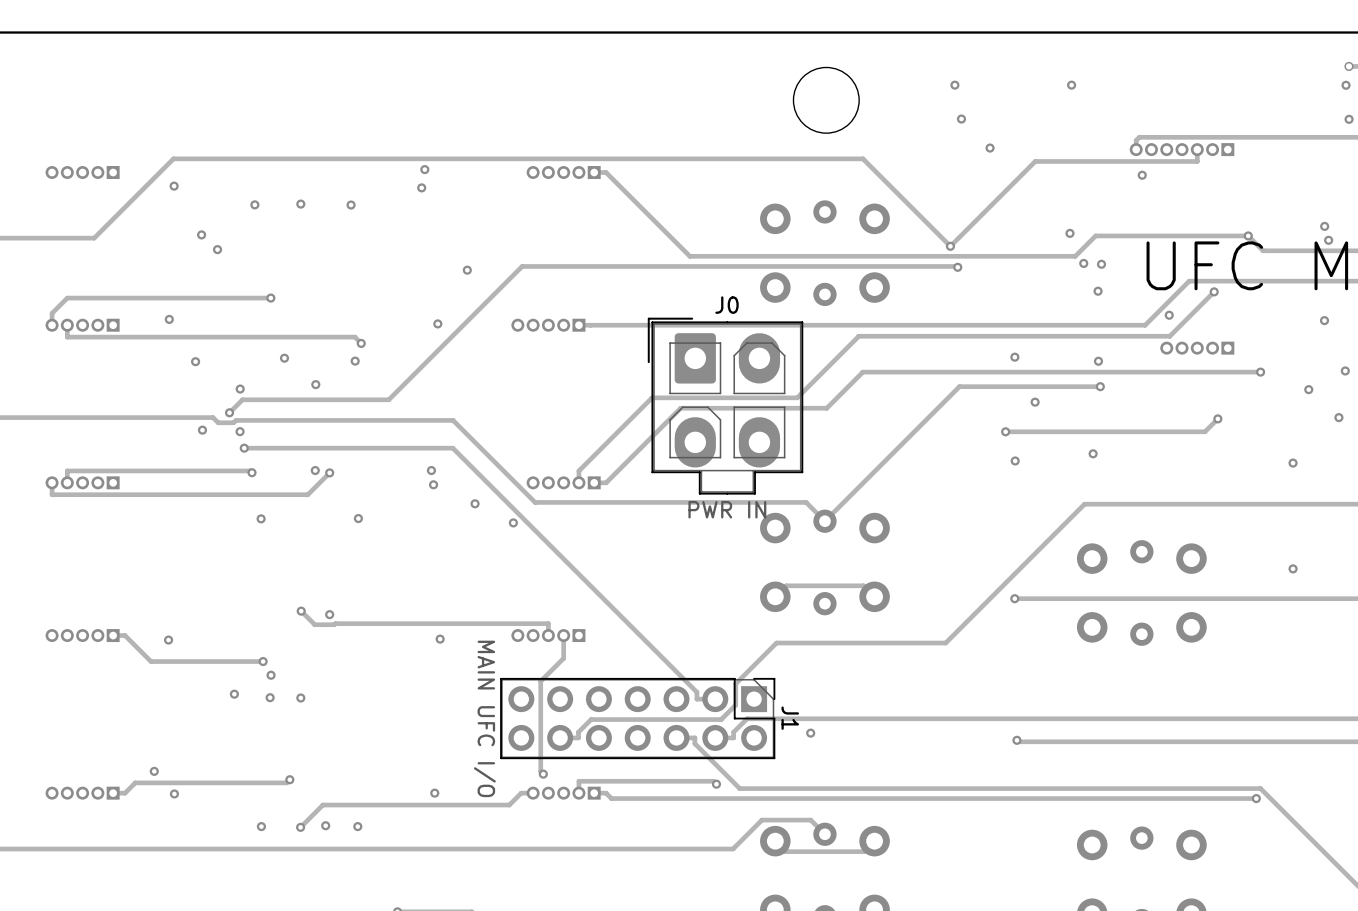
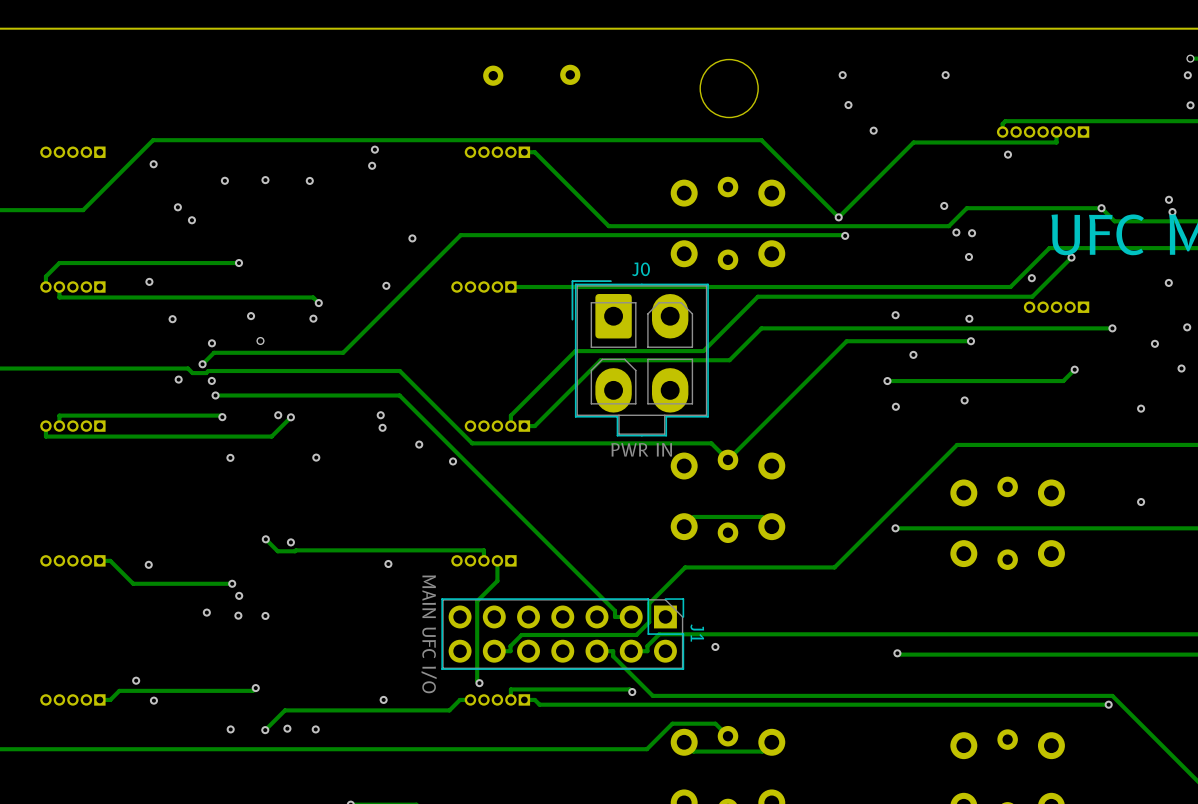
part: none -> (570, 74)
part: none -> (493, 75)
via: (315, 384) -> none
via: none -> (260, 340)

